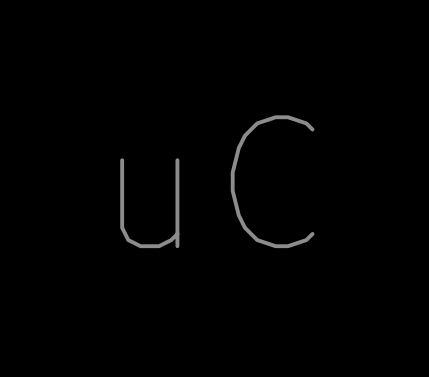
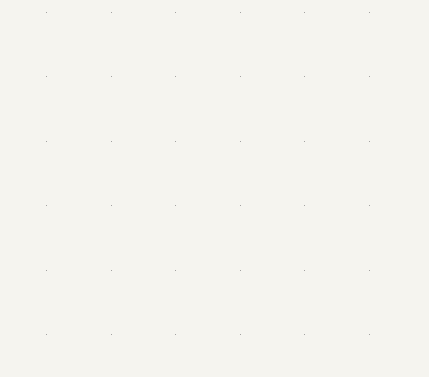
text: uC (217, 181) -> none

